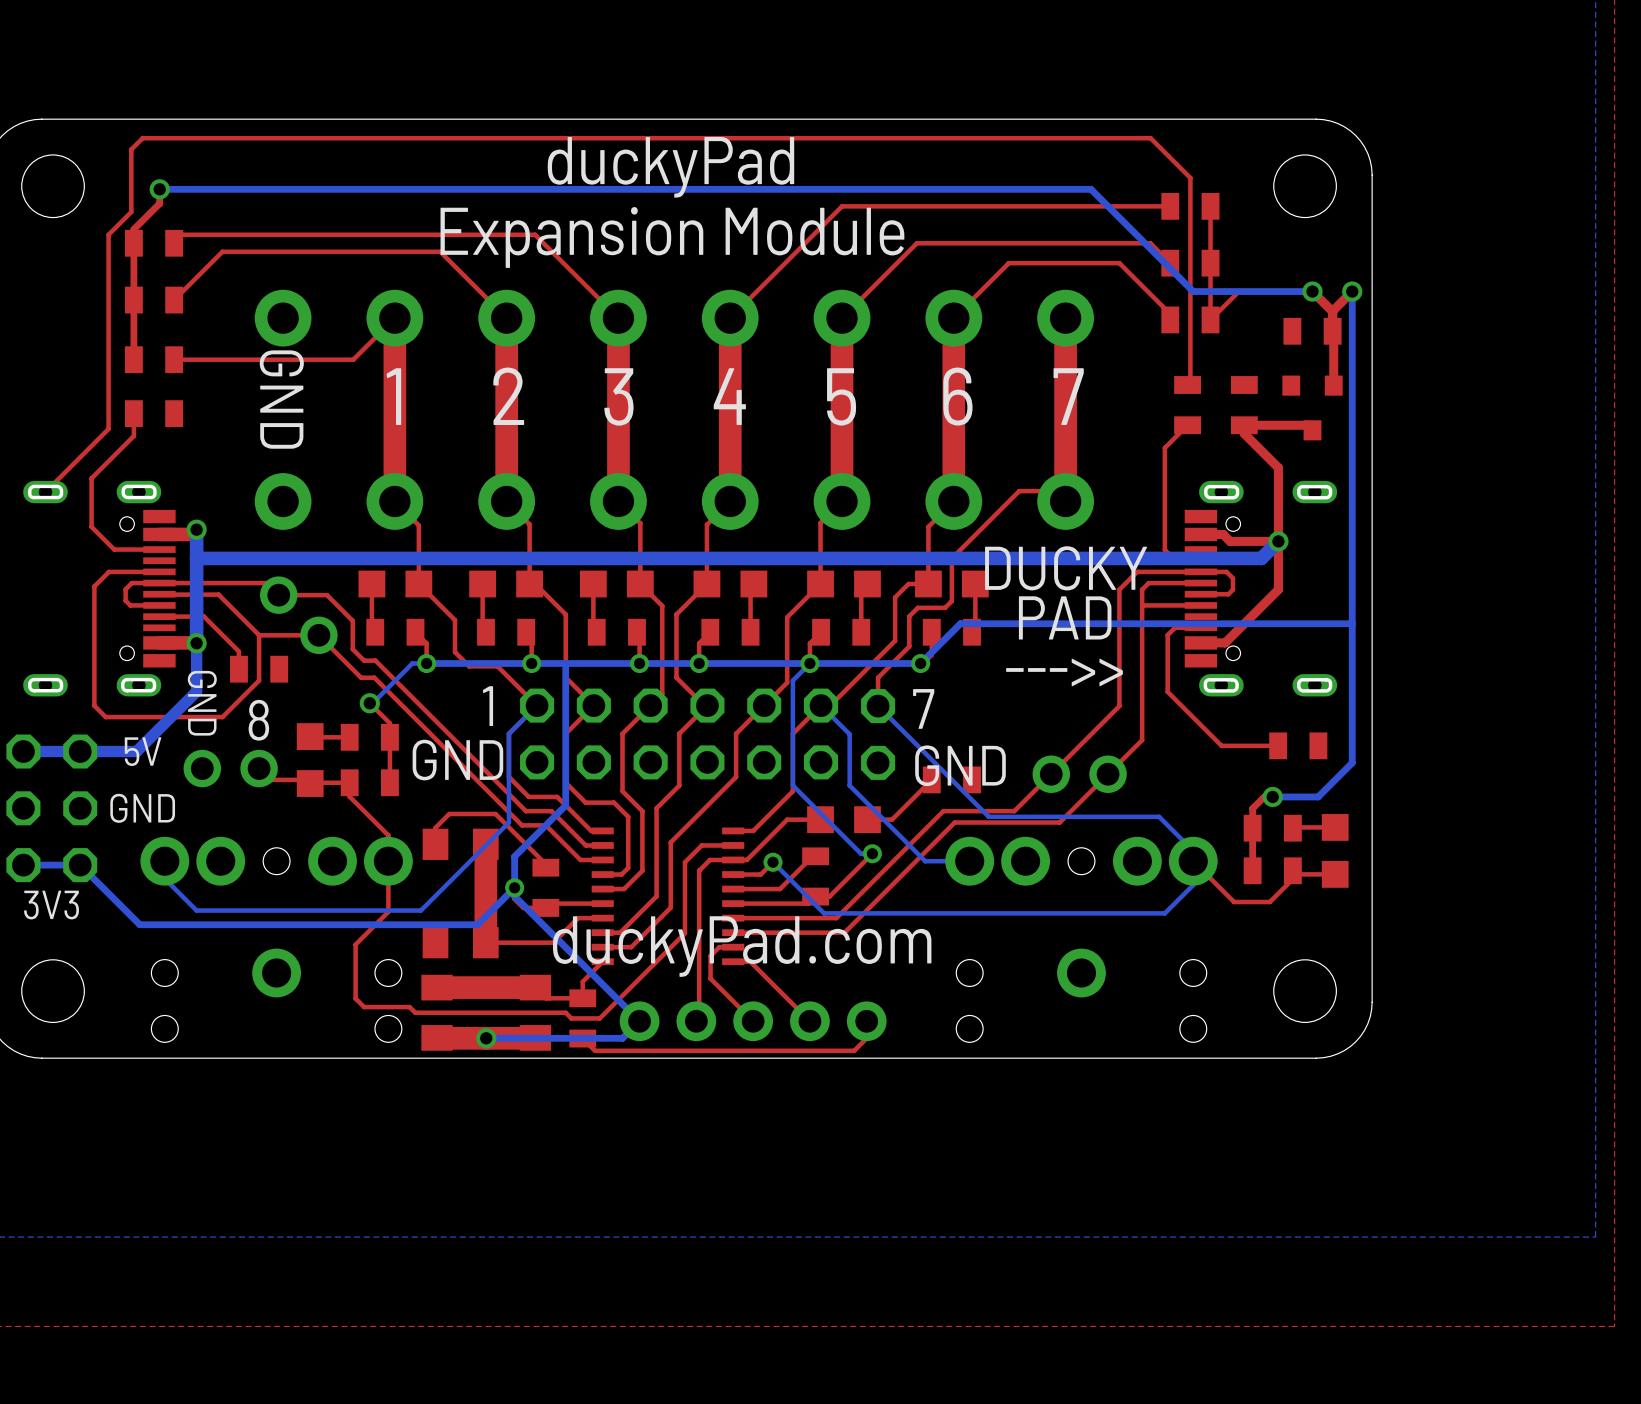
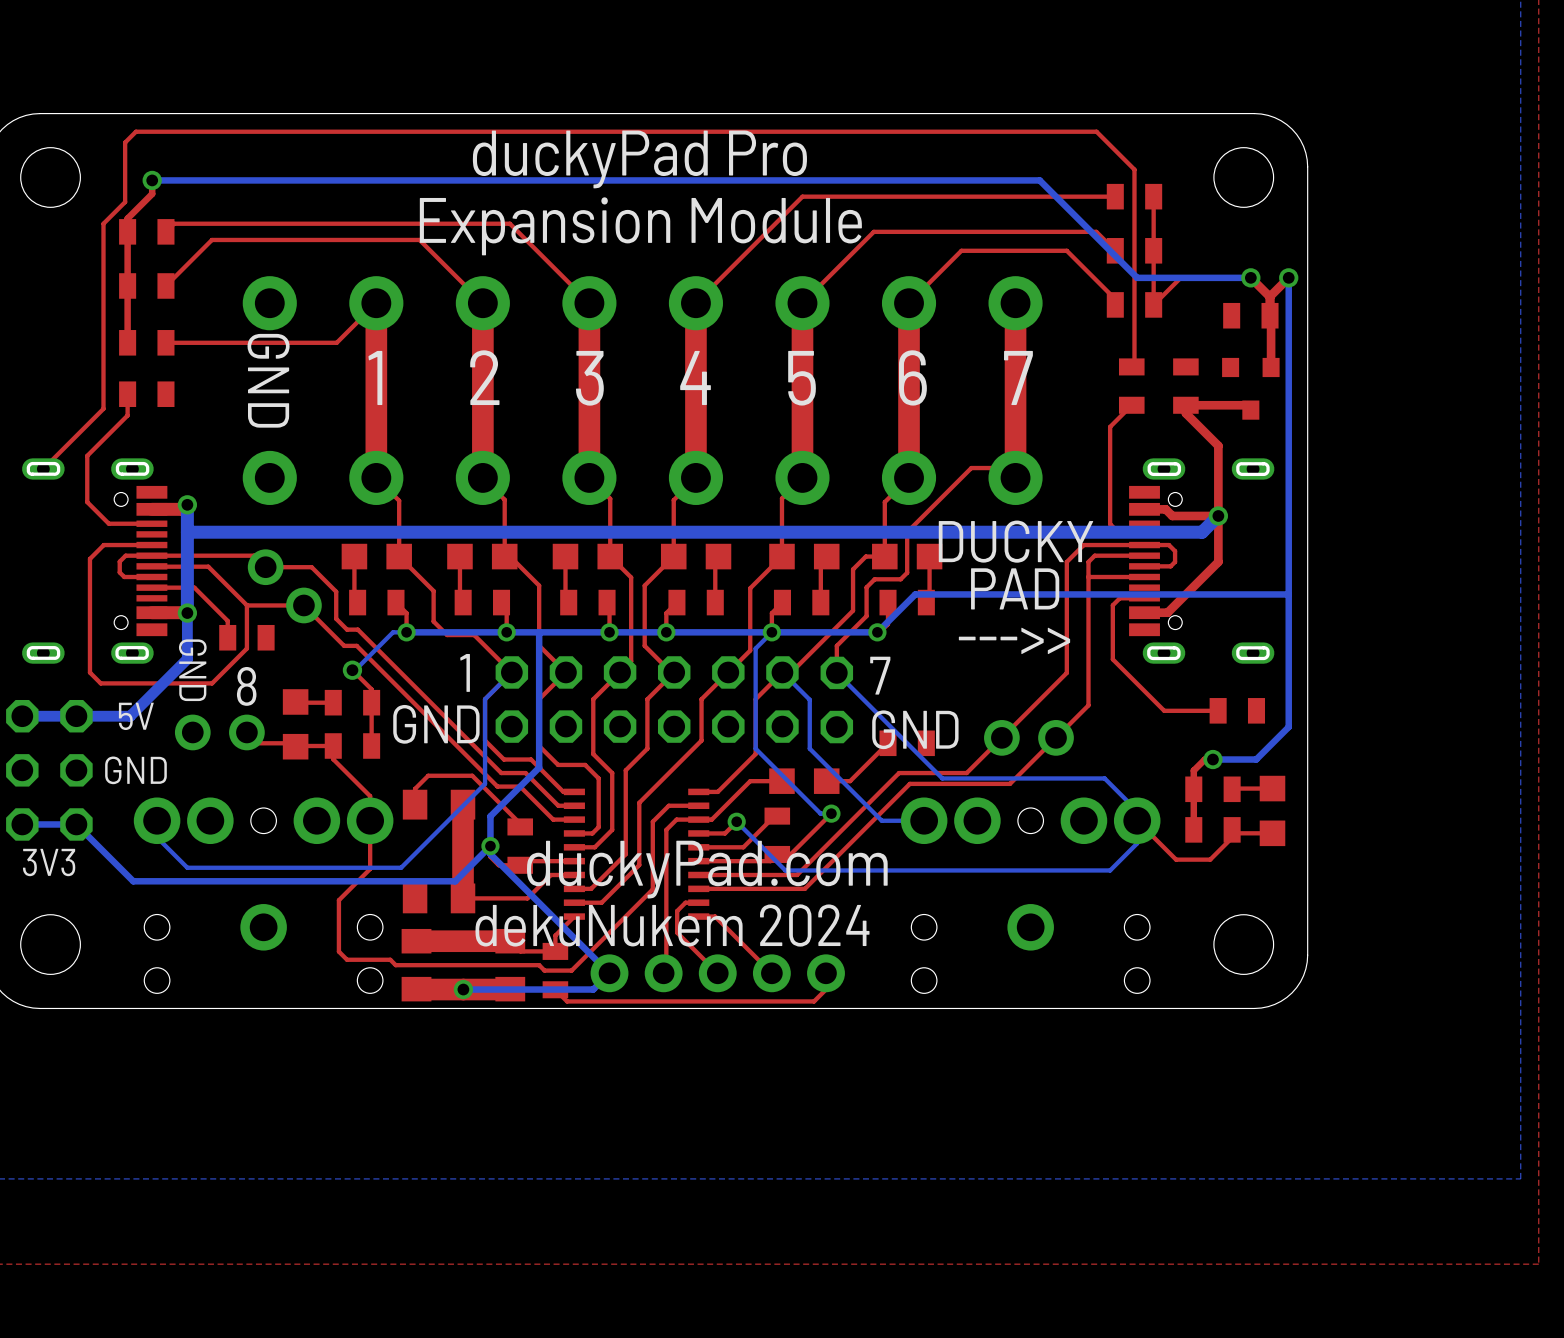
text: duckyPad (670, 167) -> duckyPad Pro (639, 159)
text position: duckyPad.com (742, 946) -> duckyPad.com (707, 869)
text: none -> dekuNukem 2024 (672, 925)

